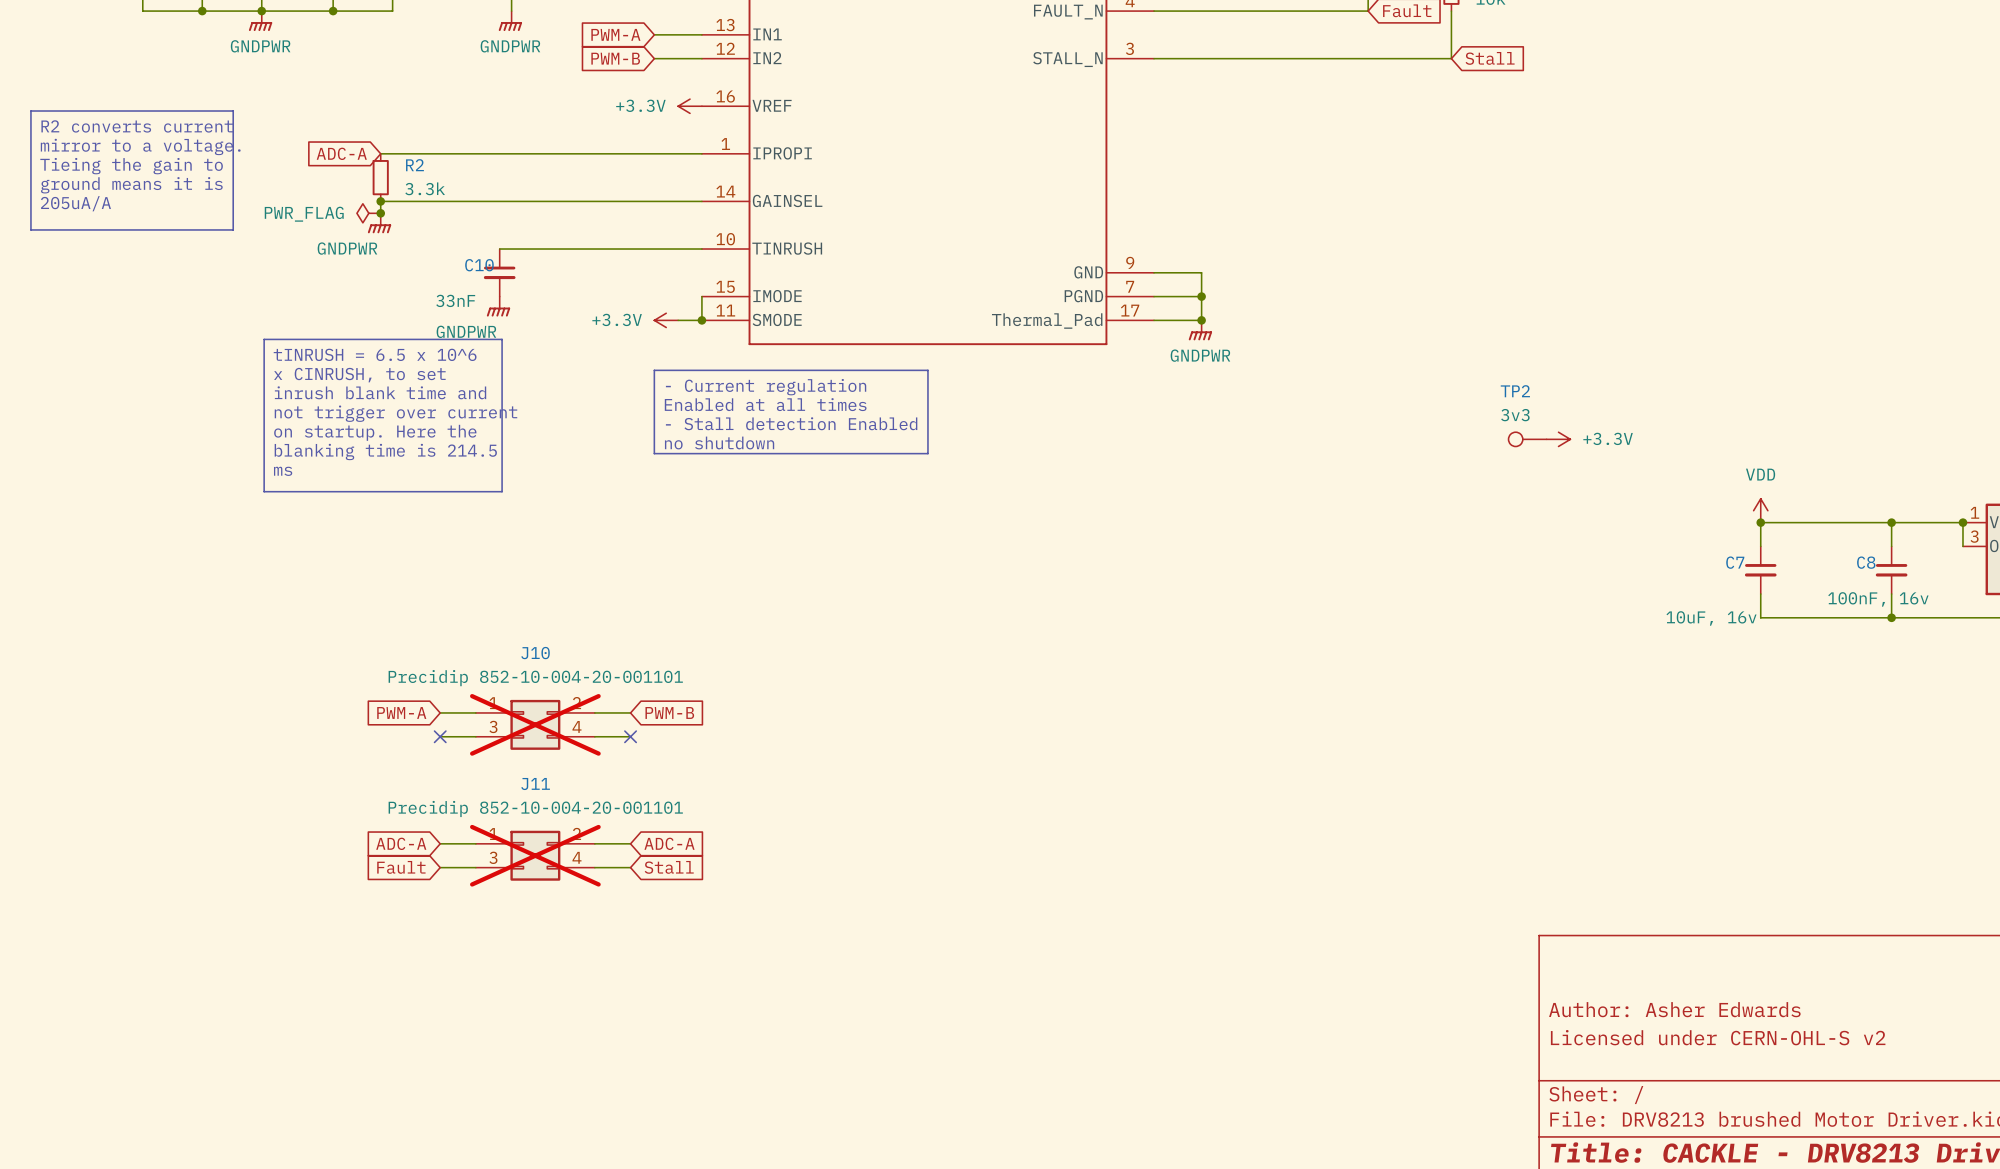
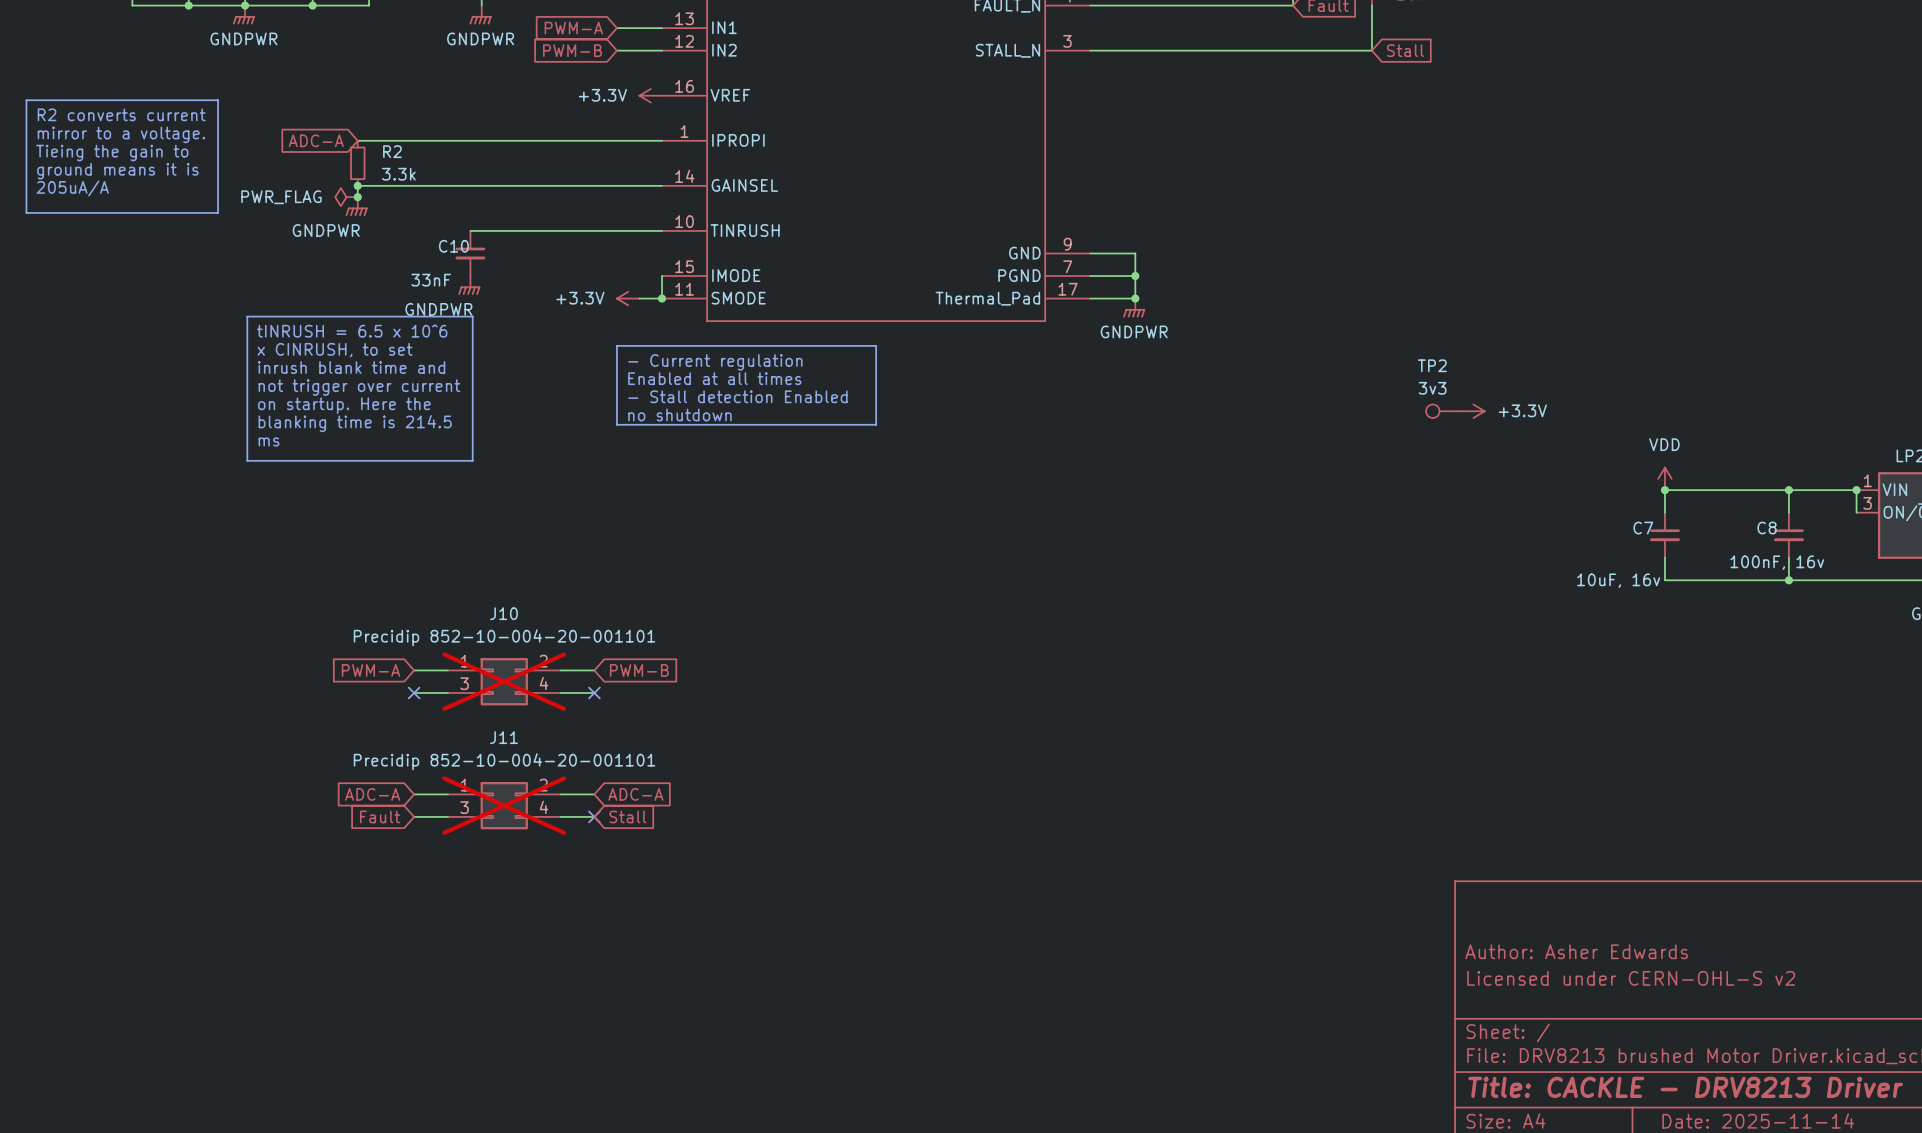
no-connect mark: none -> (594, 816)

